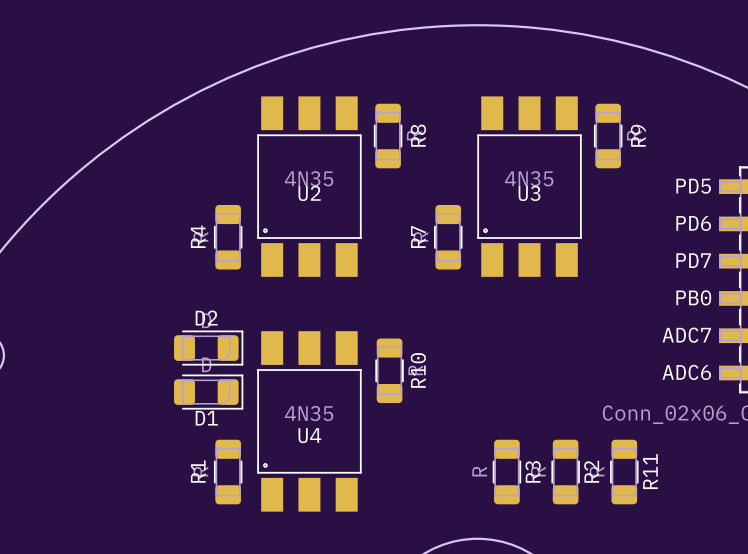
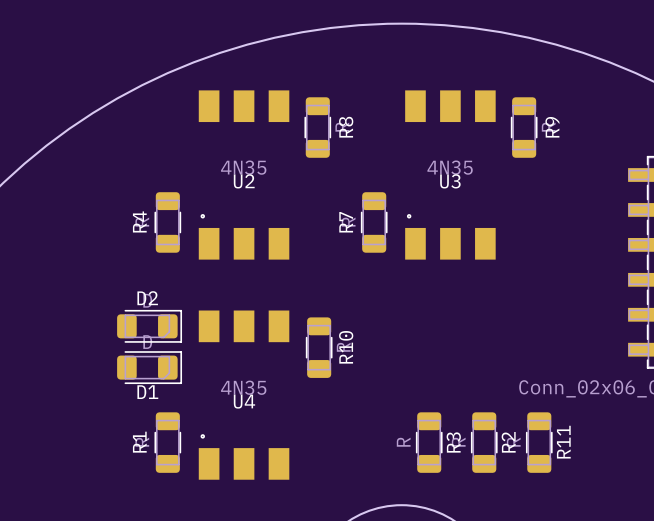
U2 footprint: [257, 96, 362, 277] -> [198, 90, 290, 260]
U3 footprint: [477, 96, 582, 277] -> [405, 90, 496, 260]
text: PD5 (693, 186) -> none
text: PD6 (693, 223) -> none
text: PD7 (693, 260) -> none
text: PB0 (693, 297) -> none
U4 footprint: [257, 331, 362, 512] -> [198, 310, 290, 480]
text: ADC7 (686, 335) -> none
text: ADC6 (686, 372) -> none

